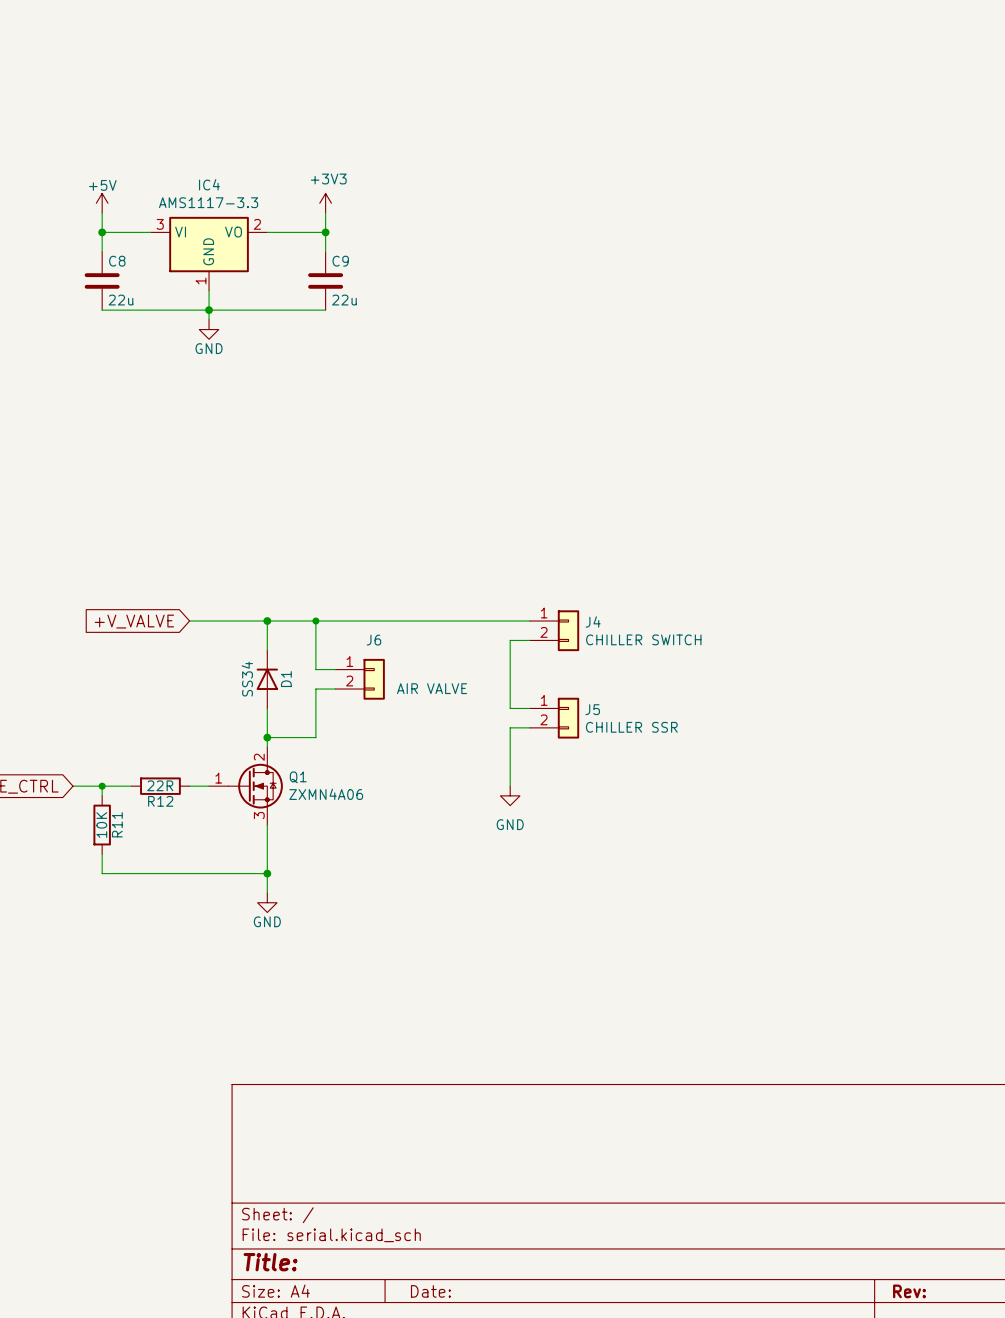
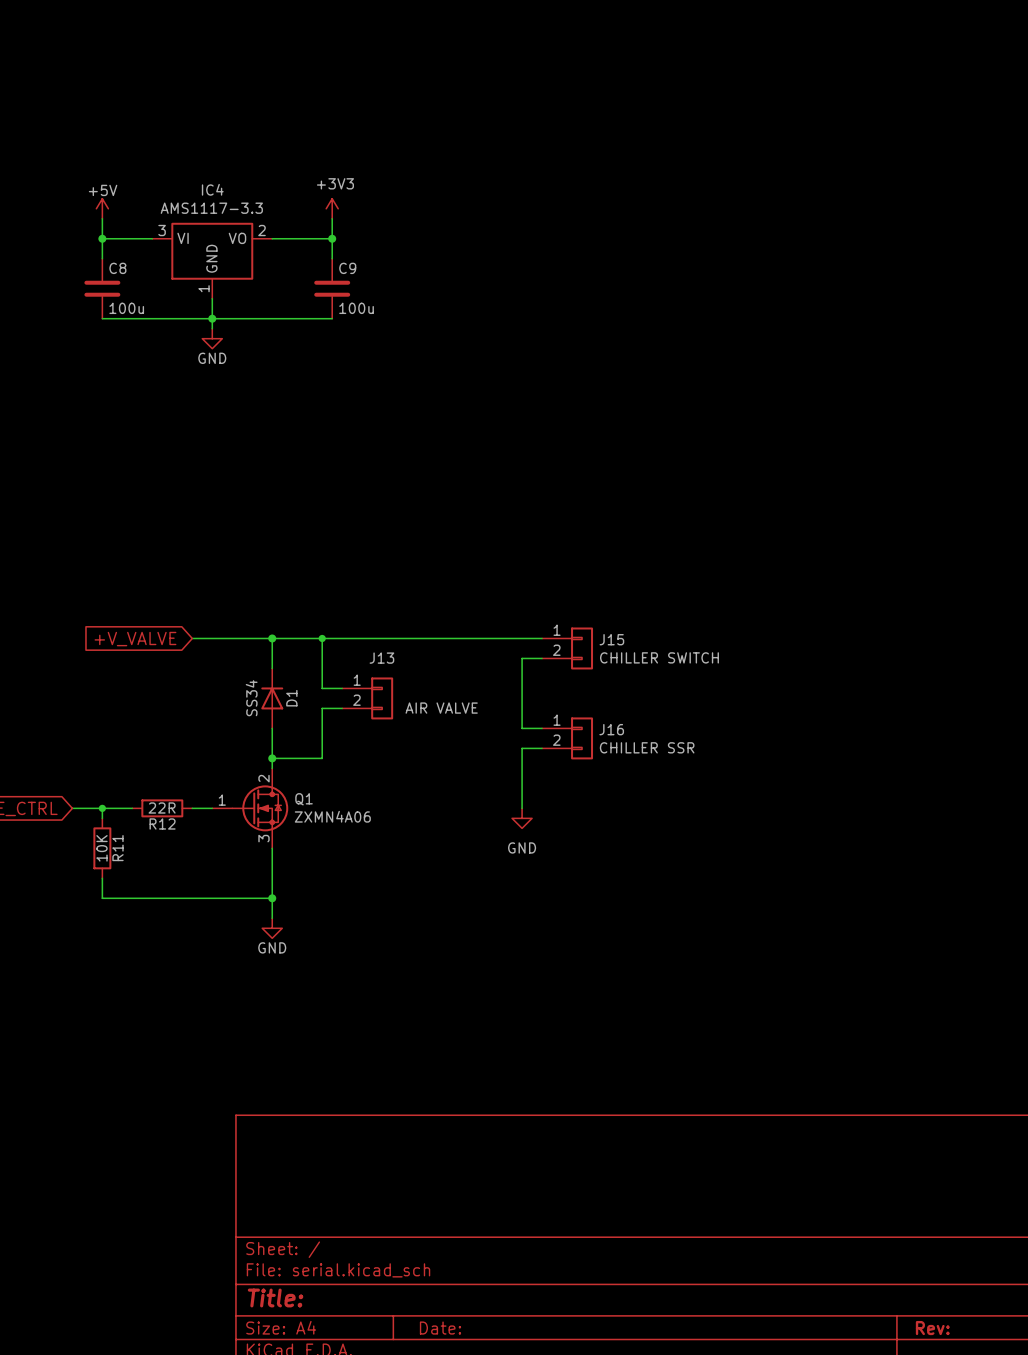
C8 value: 22u (120, 300) -> 100u (126, 308)
C9 value: 22u (344, 300) -> 100u (356, 308)
J4 name: J4 (593, 621) -> J15 (611, 639)
J6 name: J6 (373, 640) -> J13 (381, 658)
J5 name: J5 (592, 709) -> J16 (611, 729)

